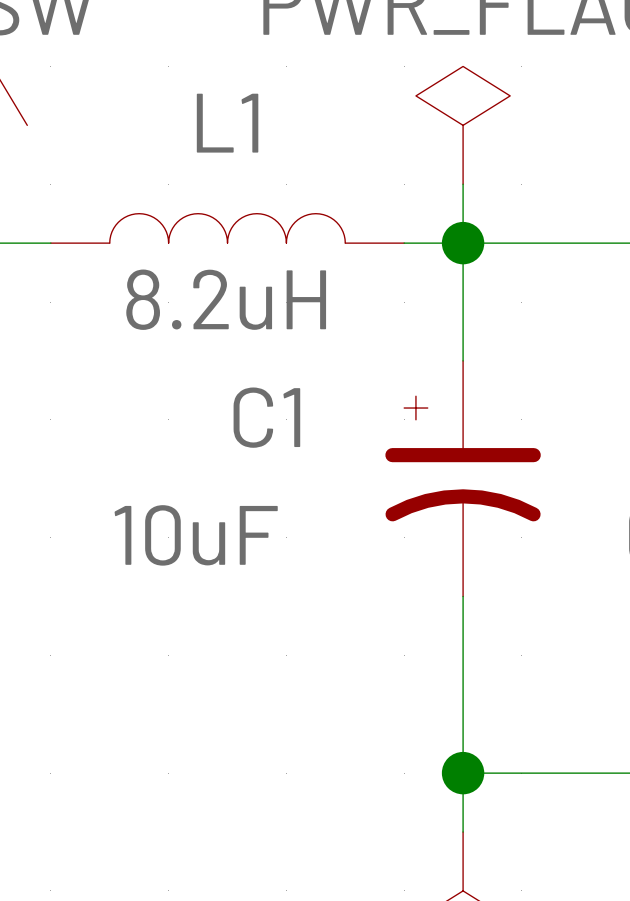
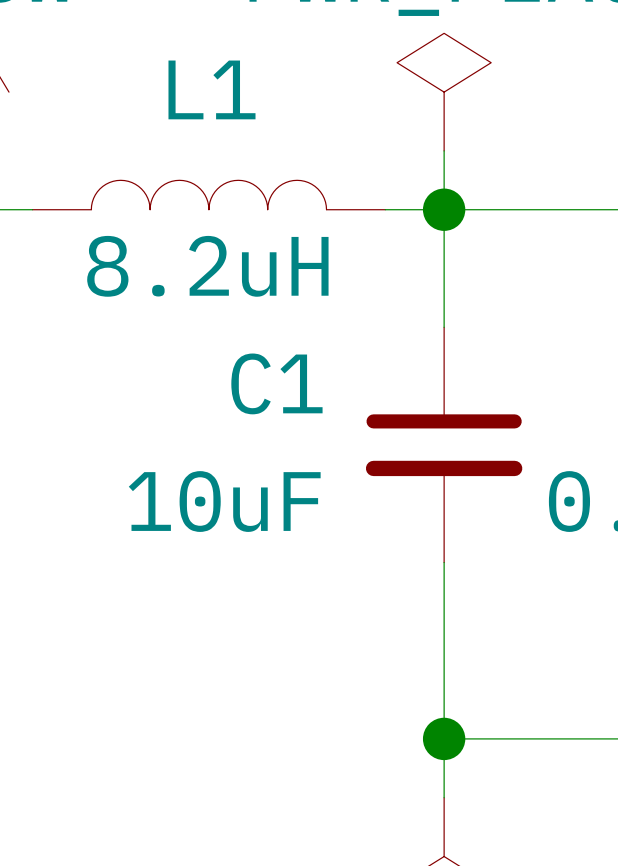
C1 symbol: [385, 360, 541, 597] -> [365, 327, 523, 563]

